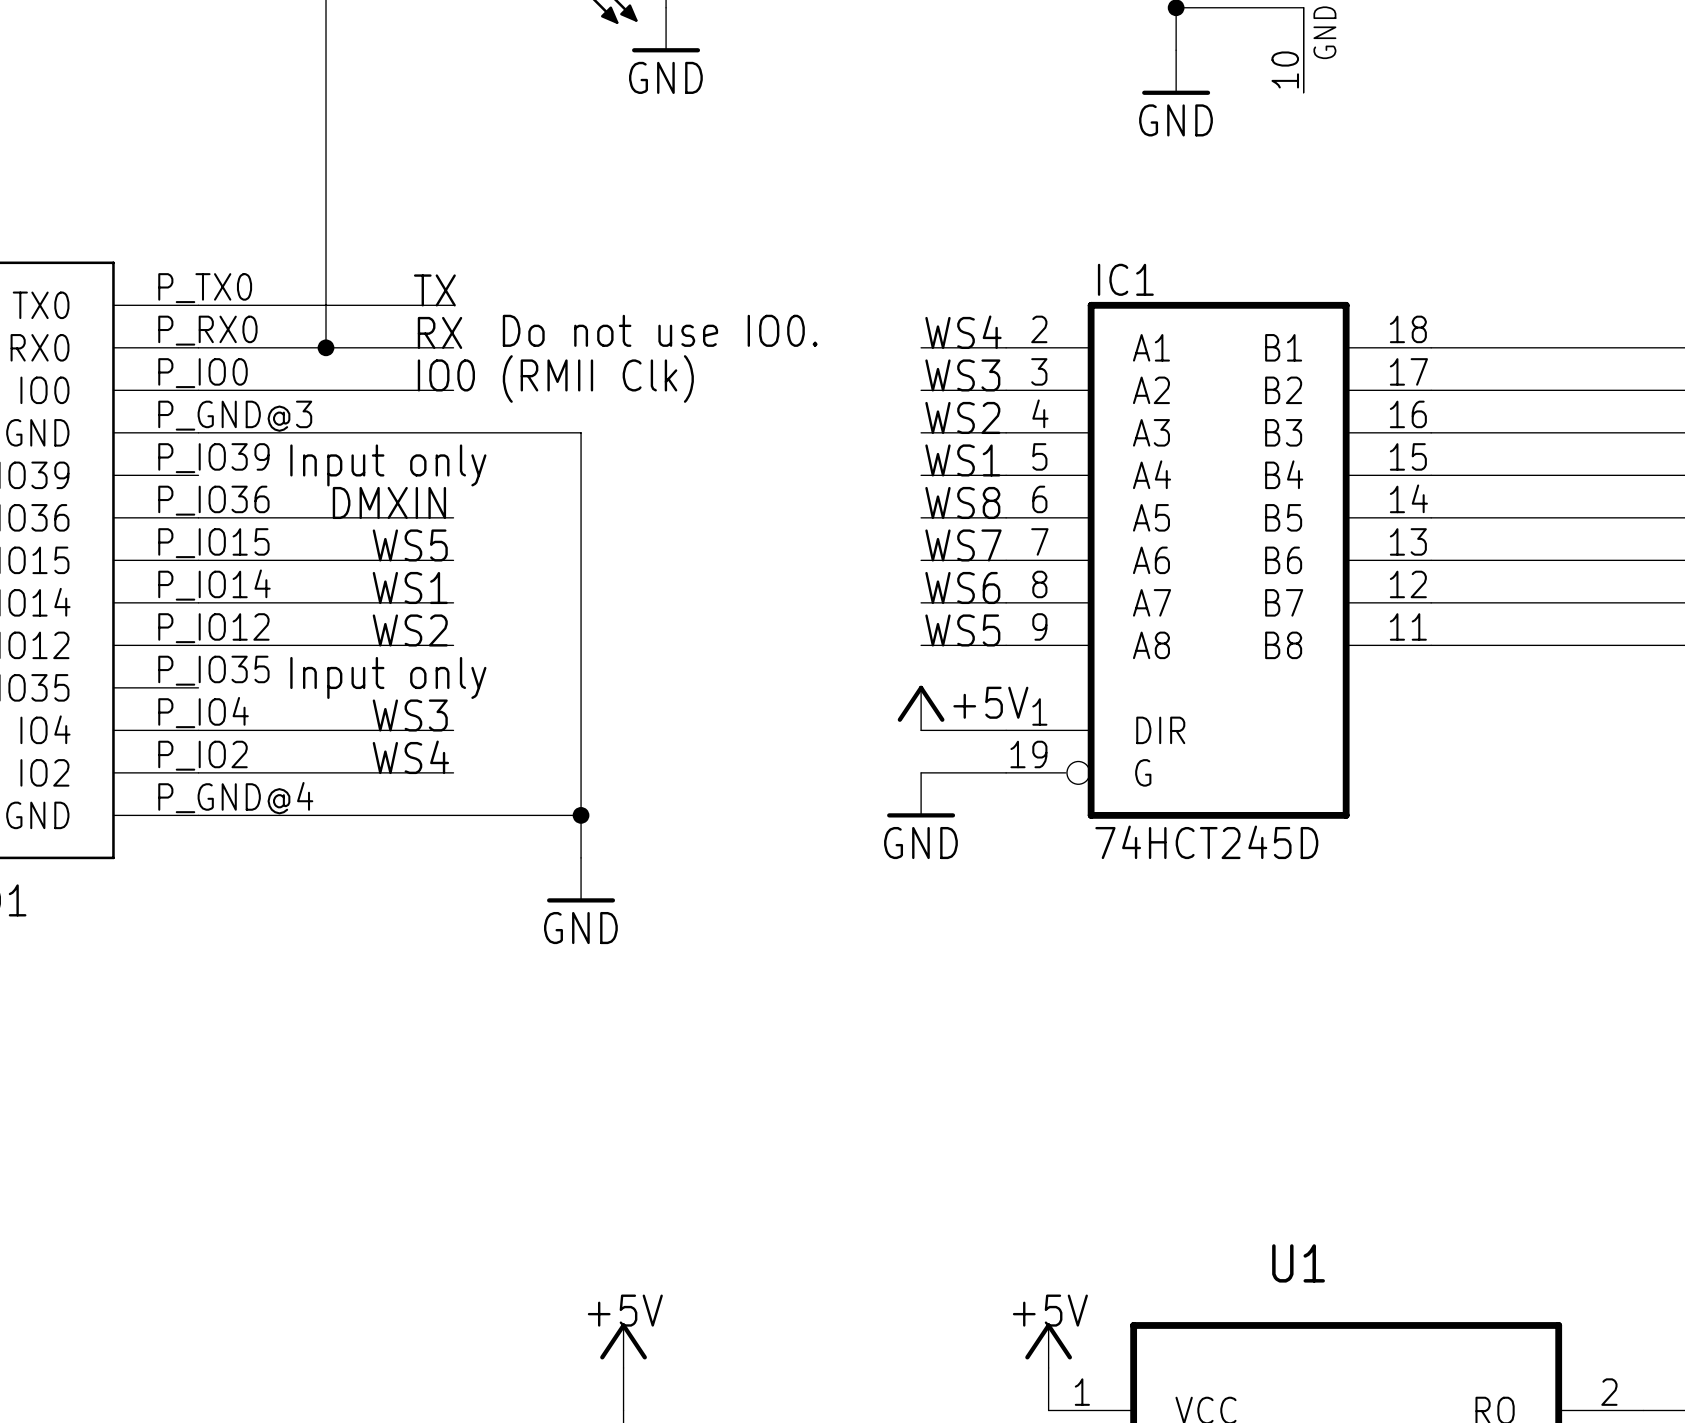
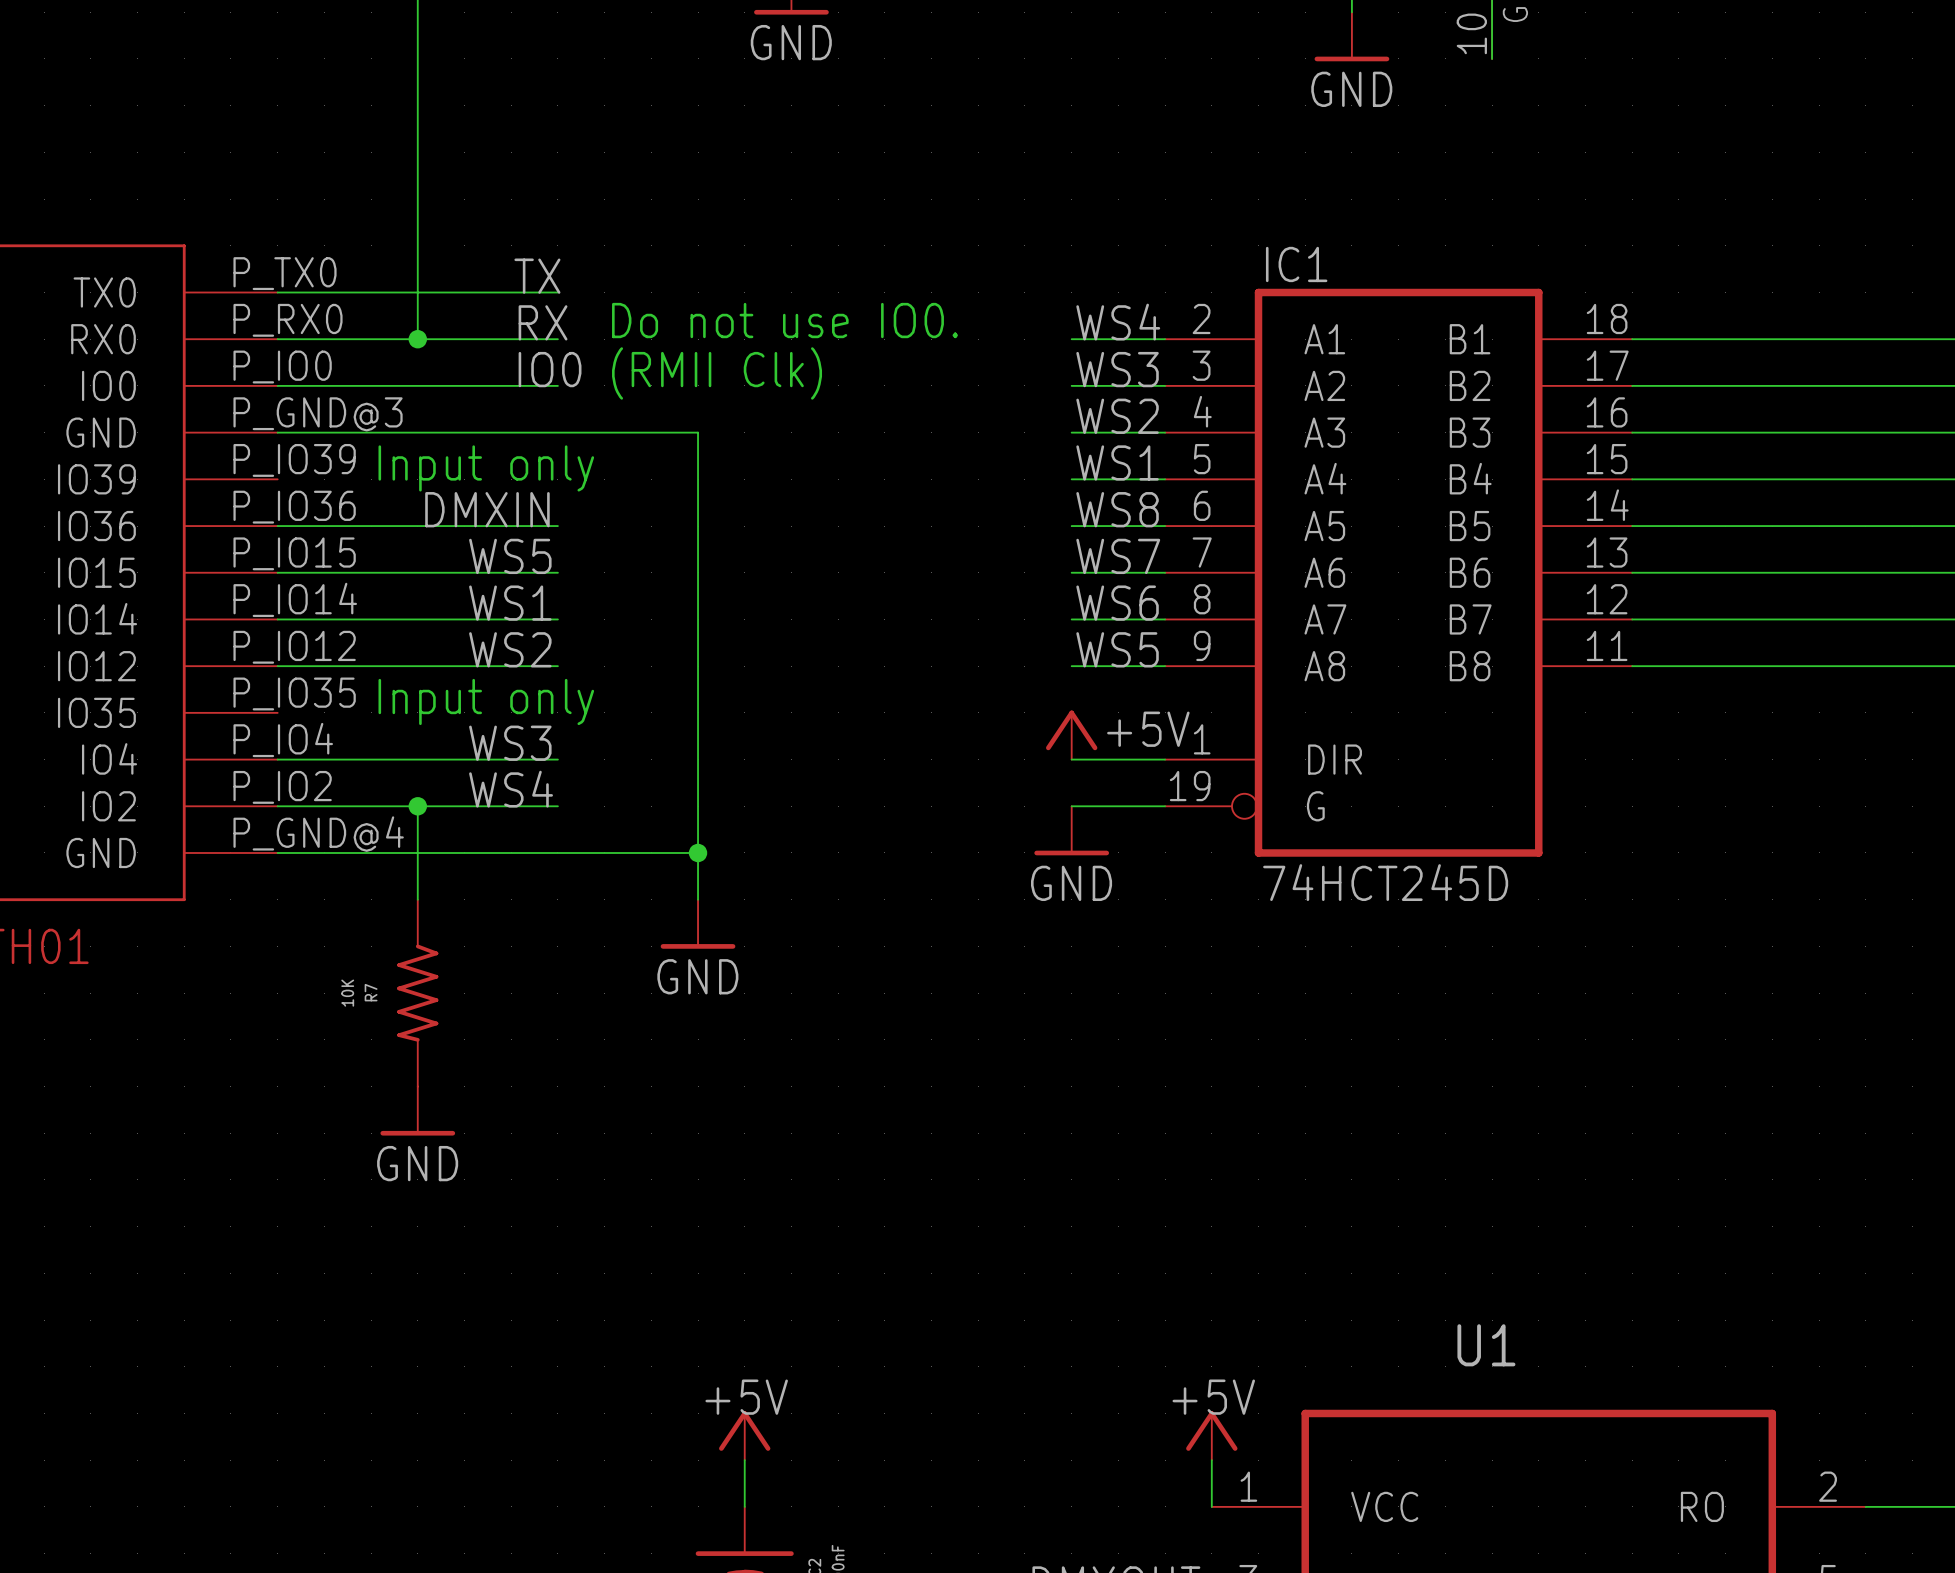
wire: none -> (417, 806) (417, 899)
junction: none -> (417, 806)
R7: none -> 10K (417, 993)
power symbol: none -> GND (417, 1111)

